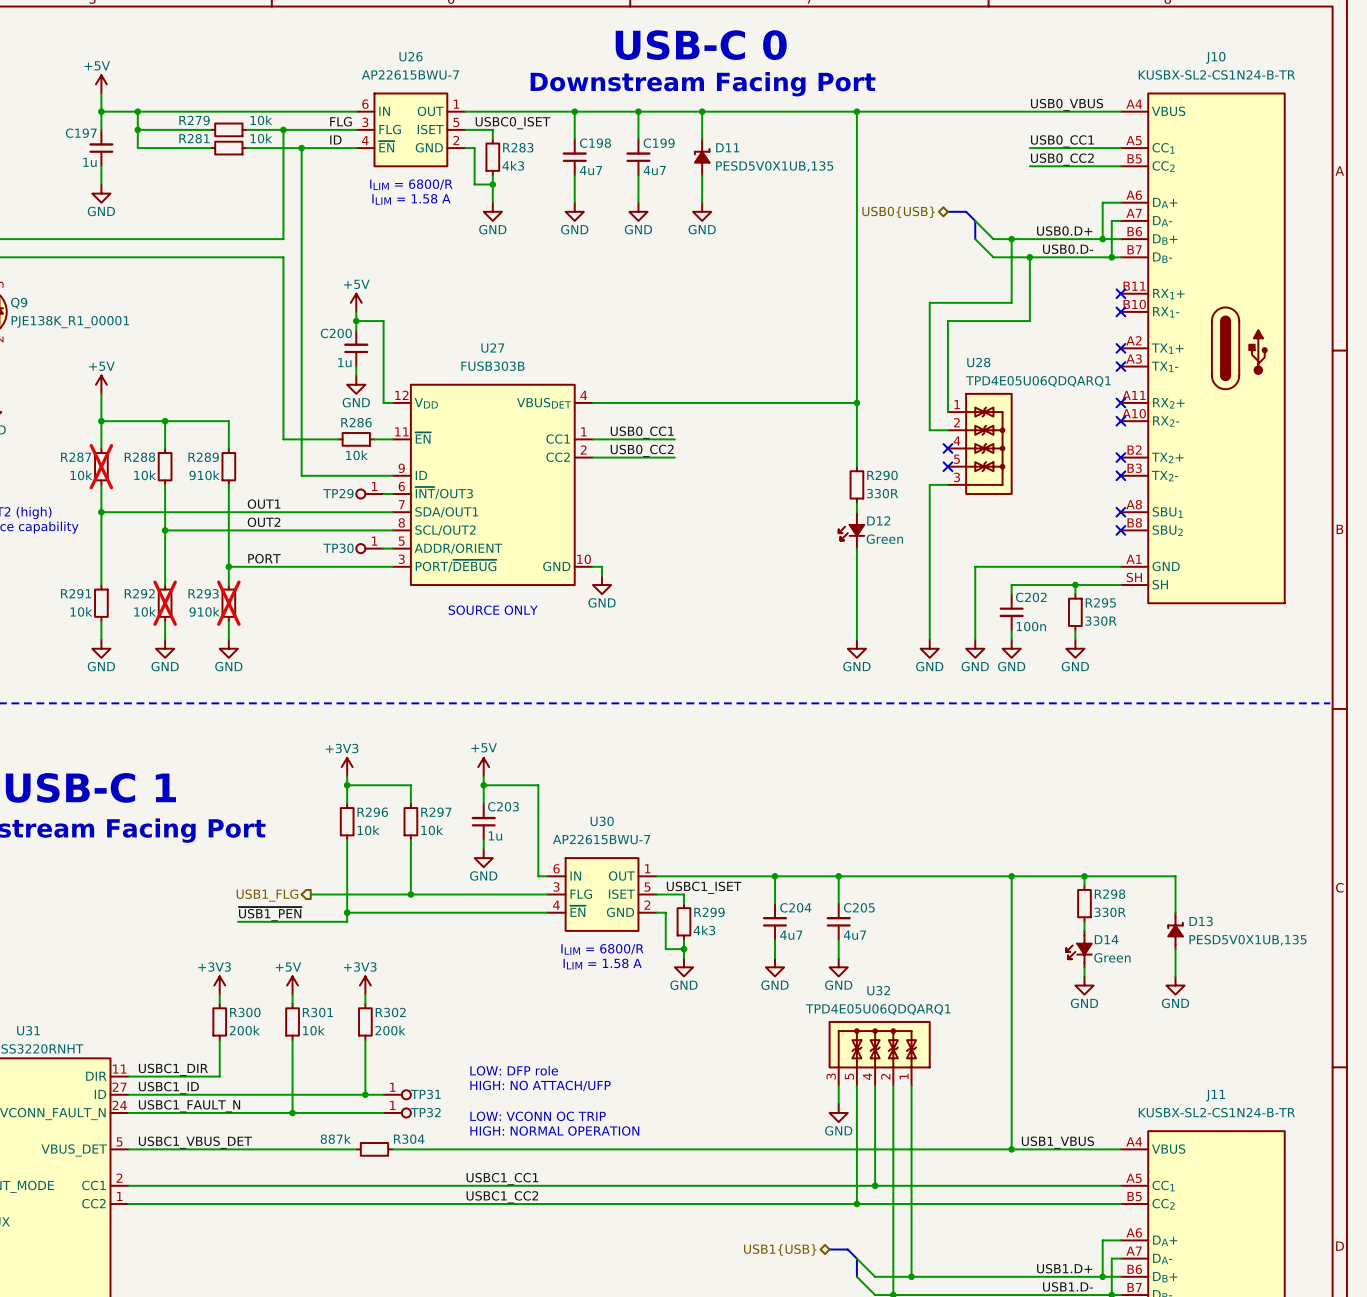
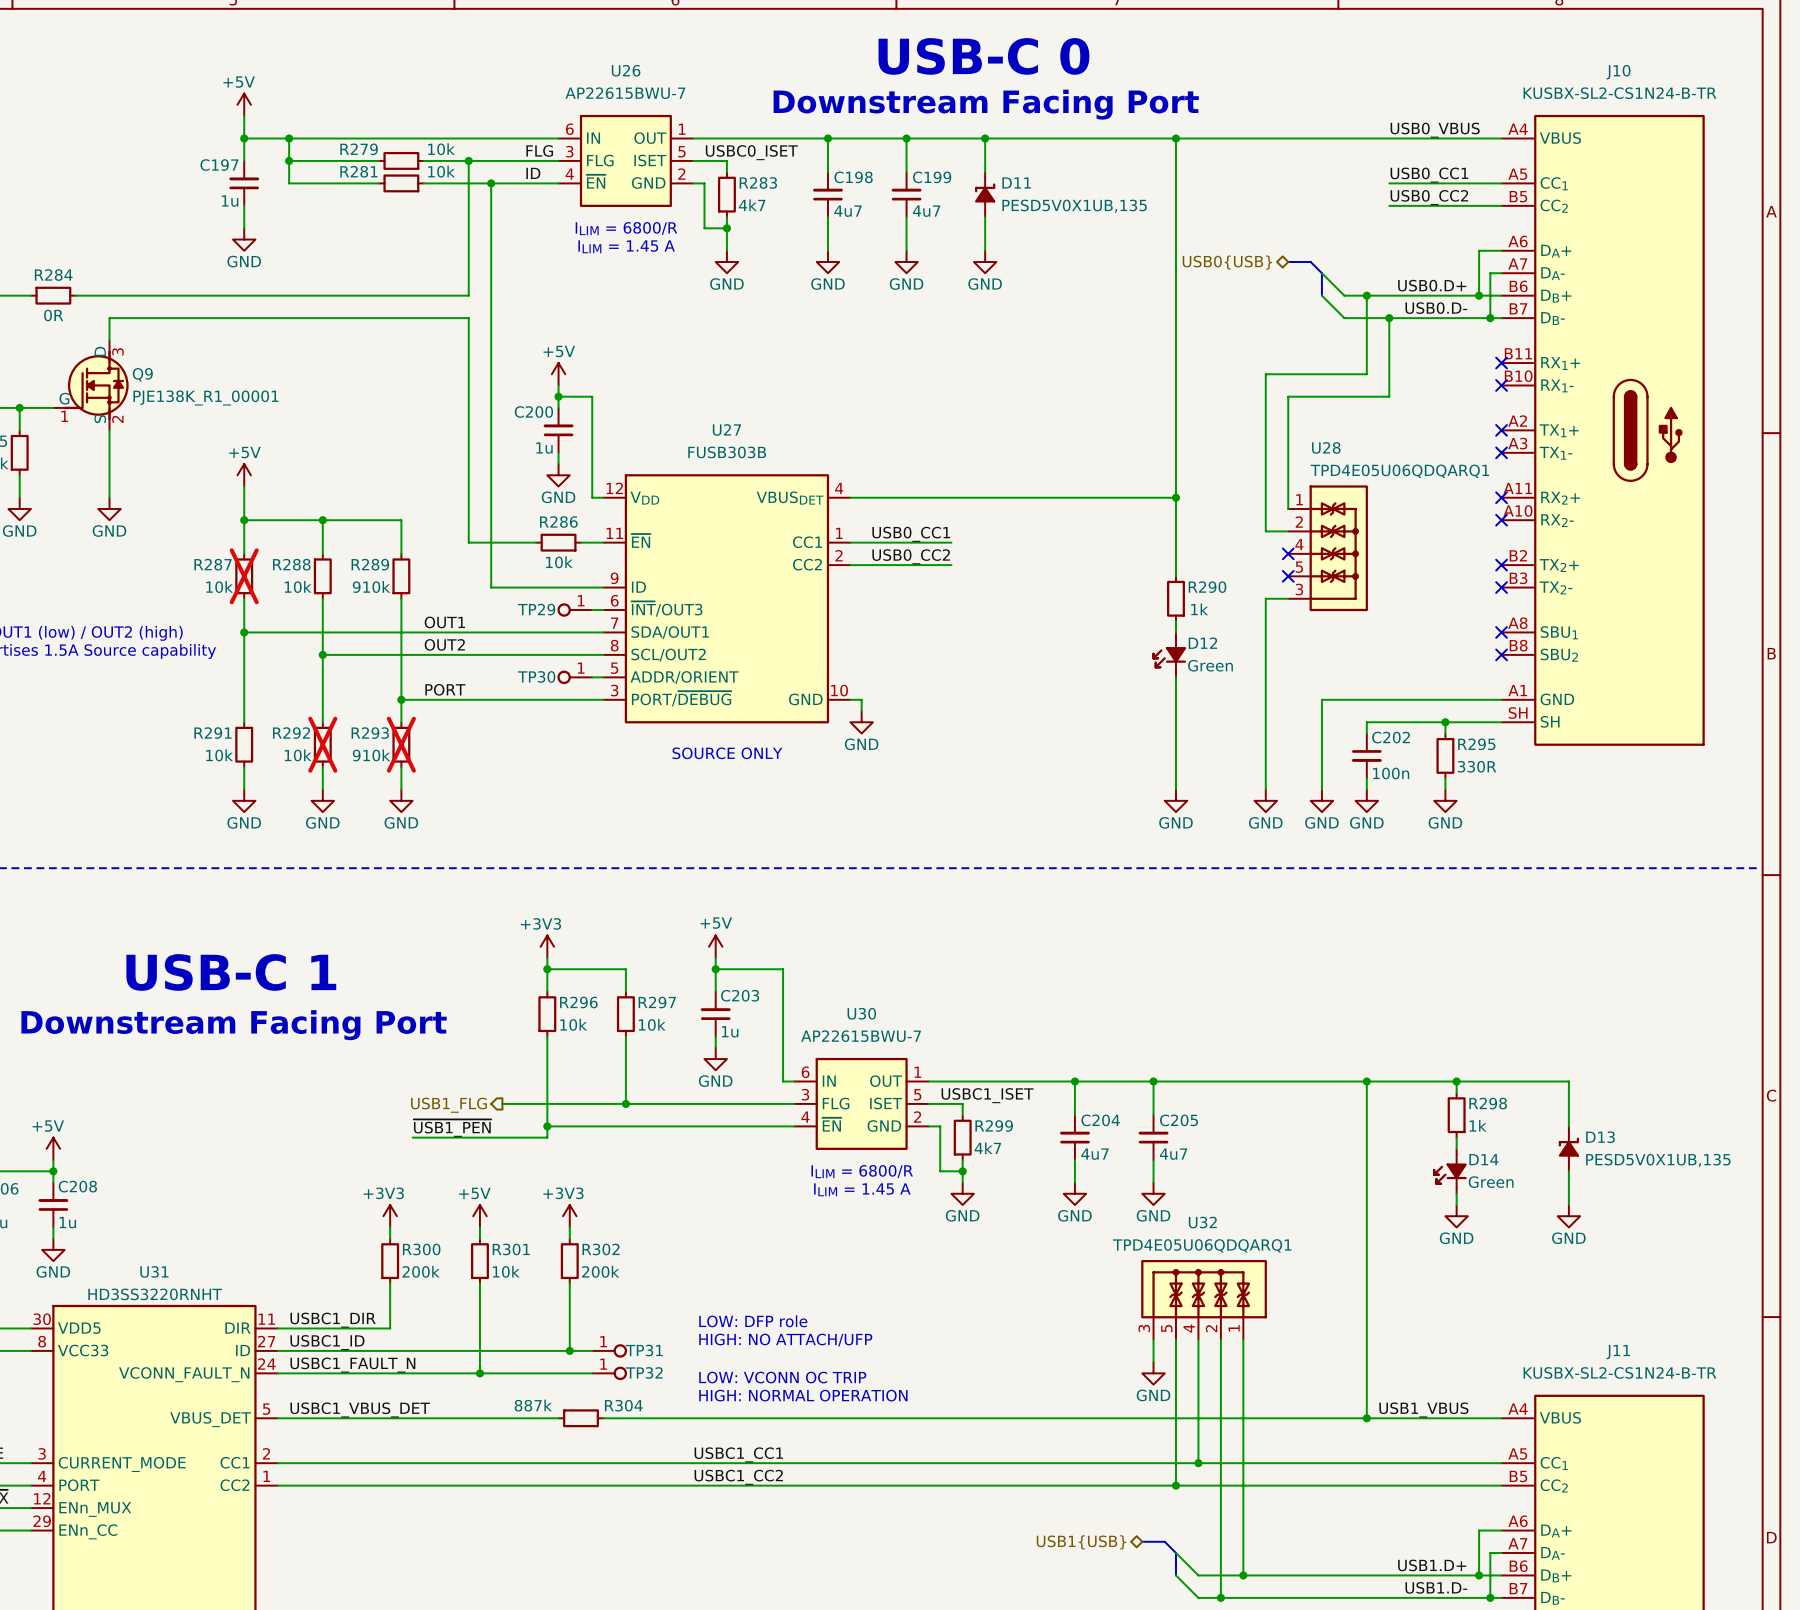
R283 text: 4k3 (513, 165) -> 4k7 (752, 205)
text: ILIM = 1.58 A (411, 199) -> ILIM = 1.45 A (626, 246)
R290 text: 330R (882, 493) -> 1k (1199, 609)
R298 text: 330R (1110, 912) -> 1k (1478, 1125)
R299 text: 4k3 (704, 930) -> 4k7 (987, 1148)
text: ILIM = 1.58 A (602, 964) -> ILIM = 1.45 A (862, 1189)

